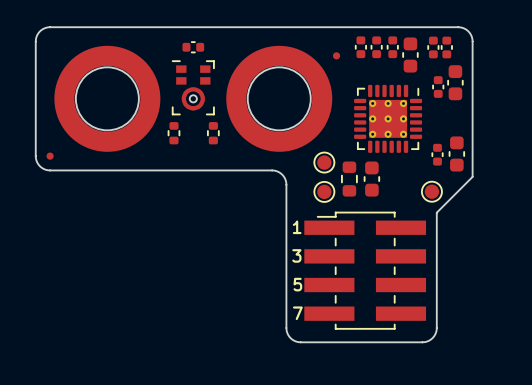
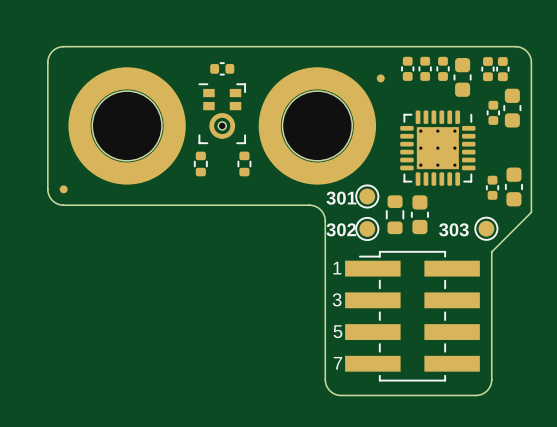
text: none -> 301 (341, 198)
text: none -> 302 (341, 229)
text: none -> 303 (453, 229)

